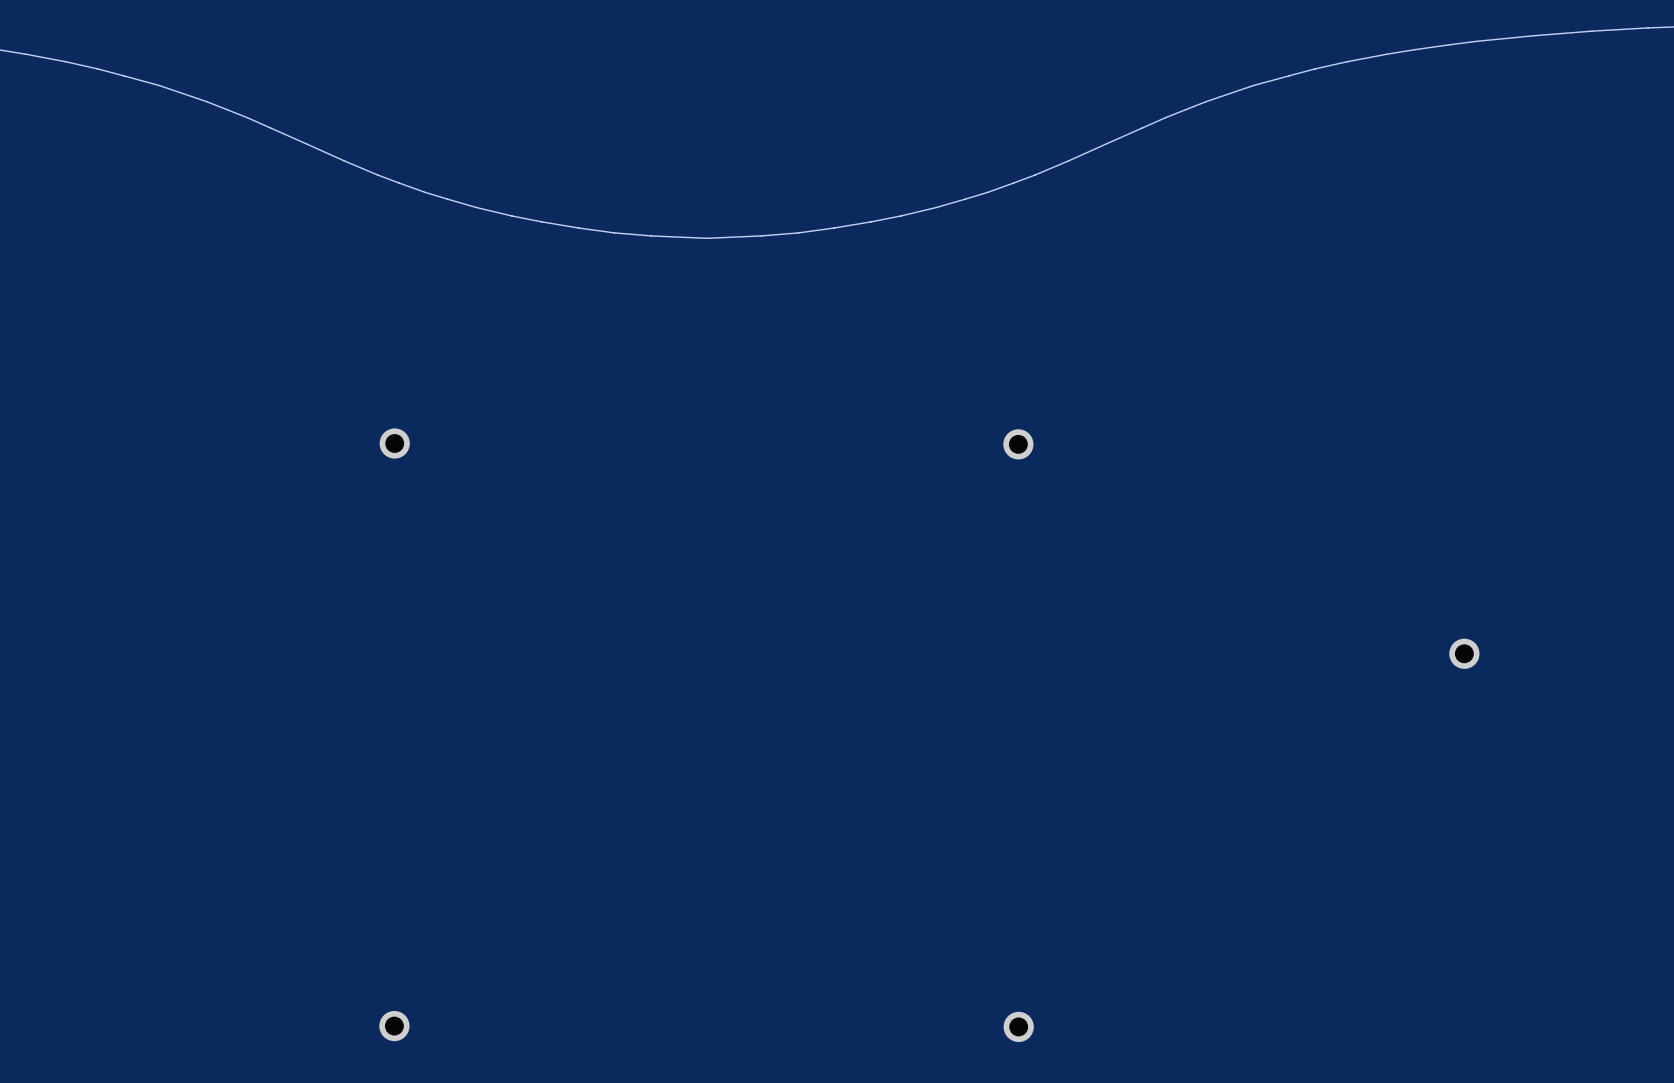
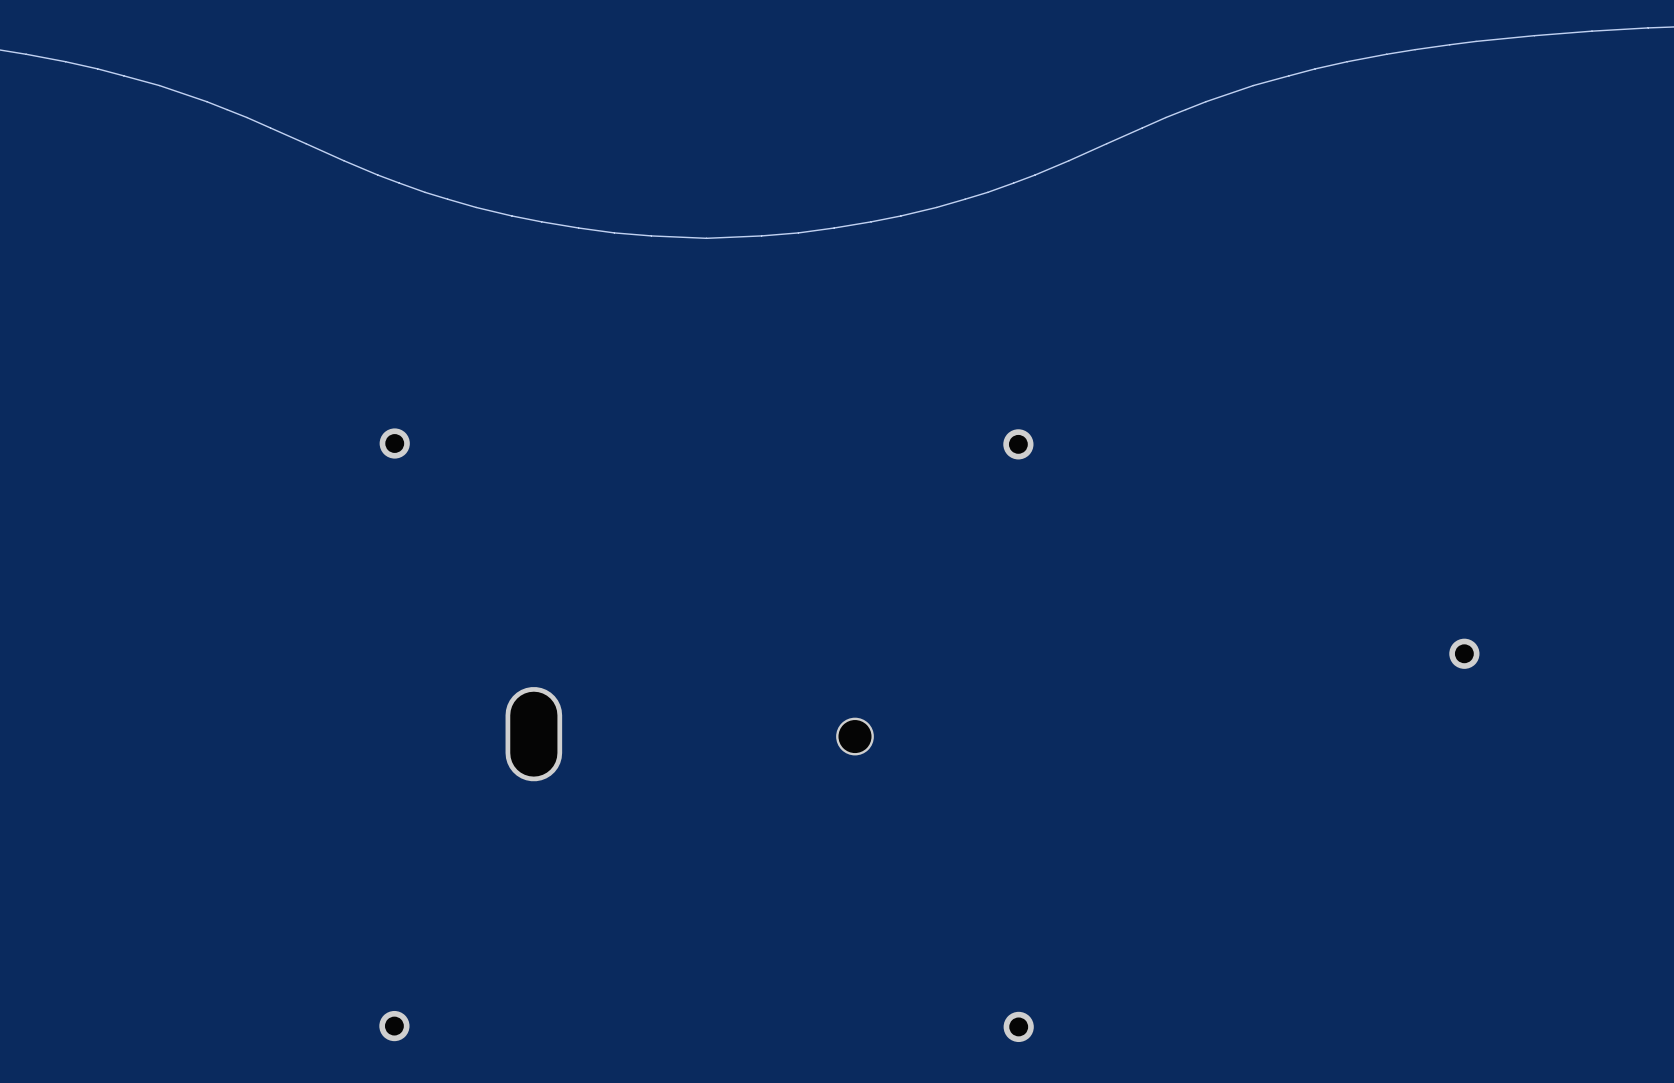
part: none -> (533, 734)
part: none -> (855, 736)

